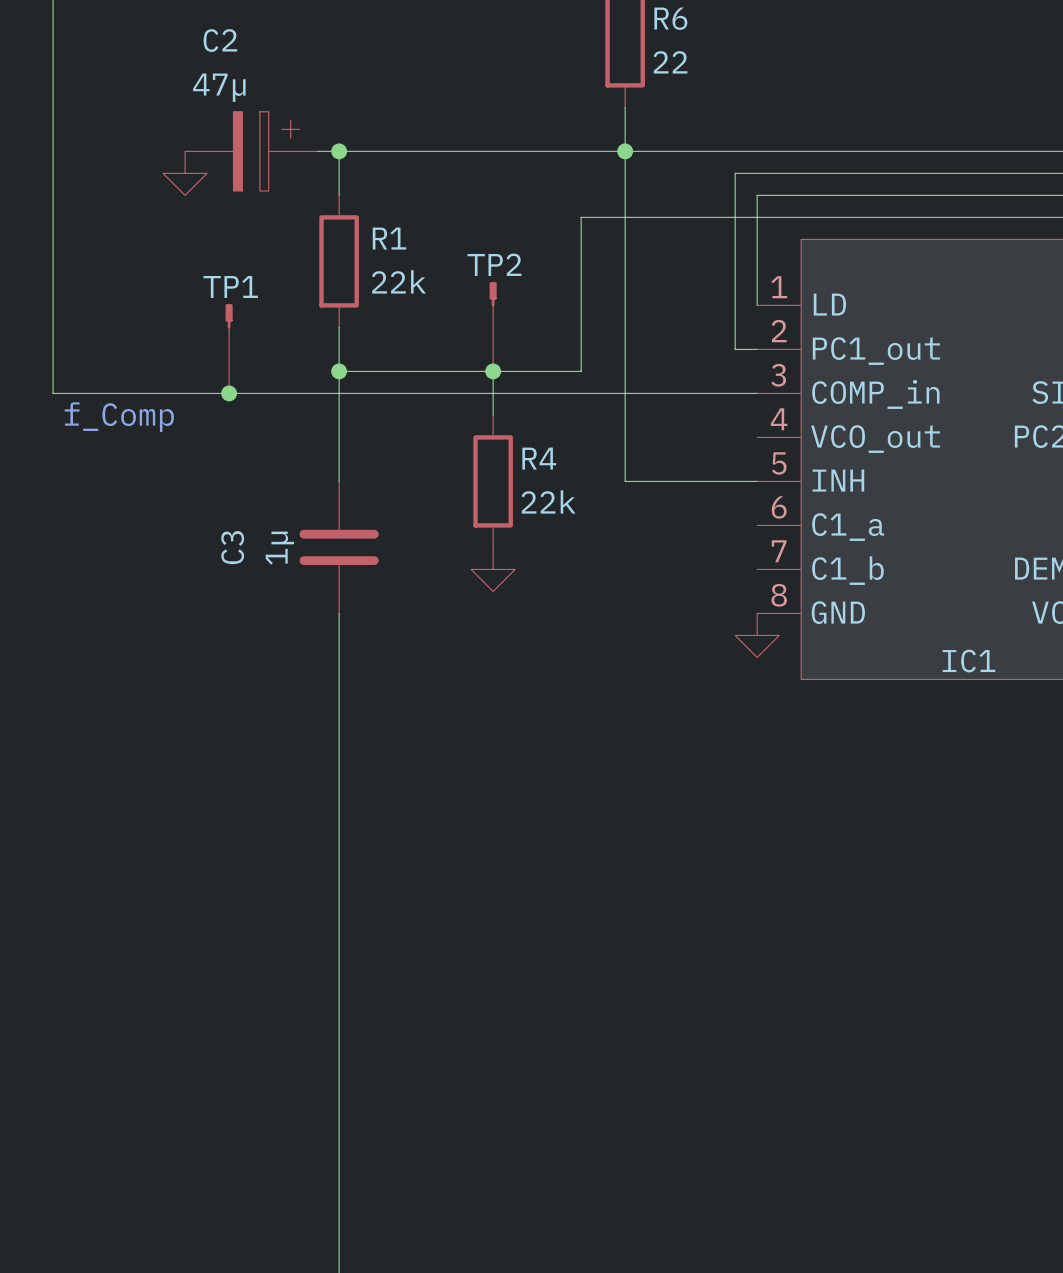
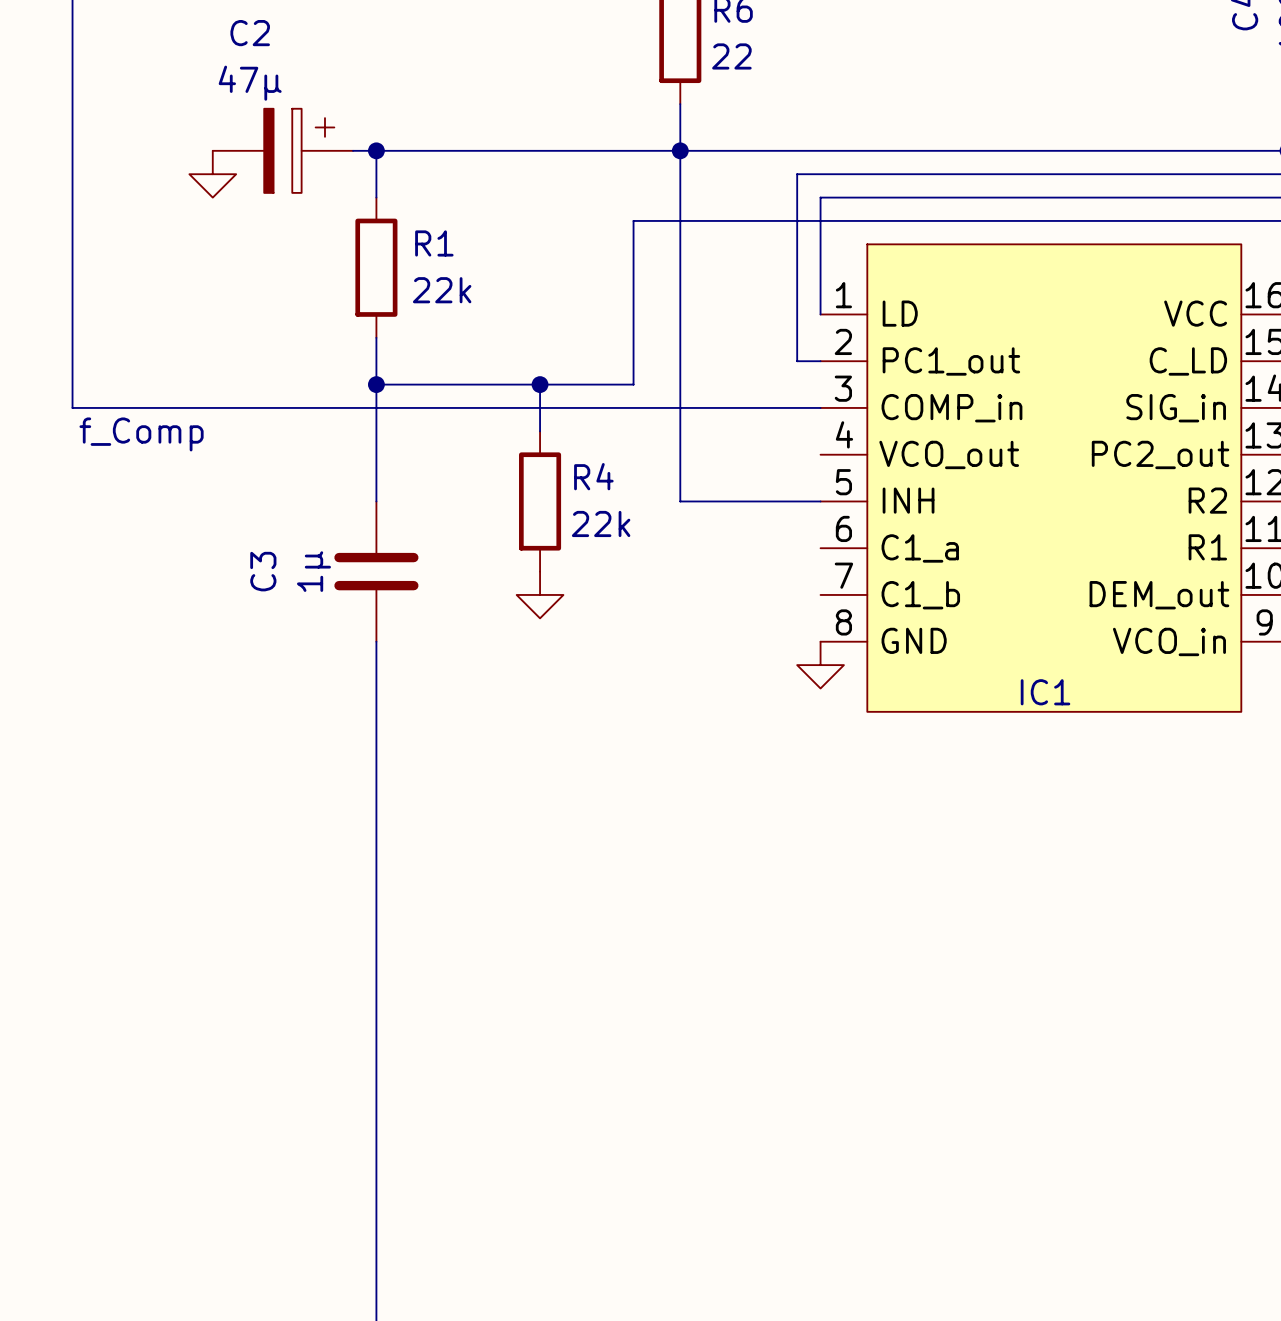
TP2: (493, 326) -> none
TP1: (229, 348) -> none
junction: (229, 393) -> none

